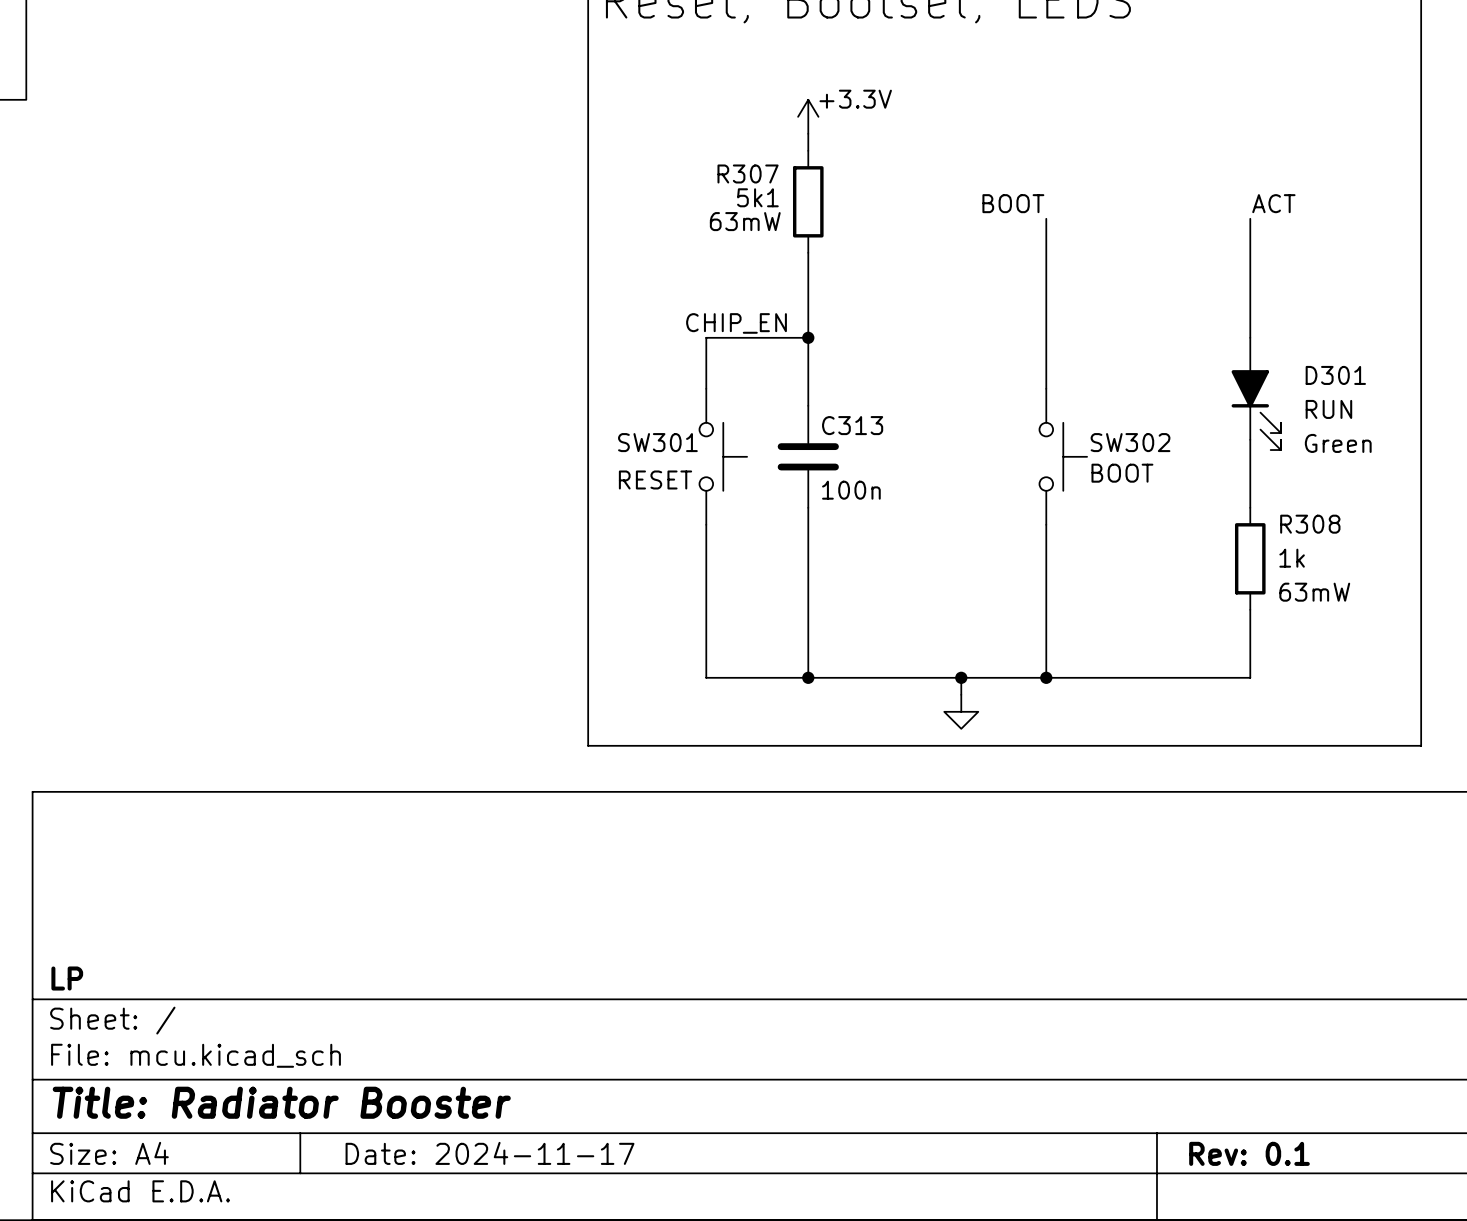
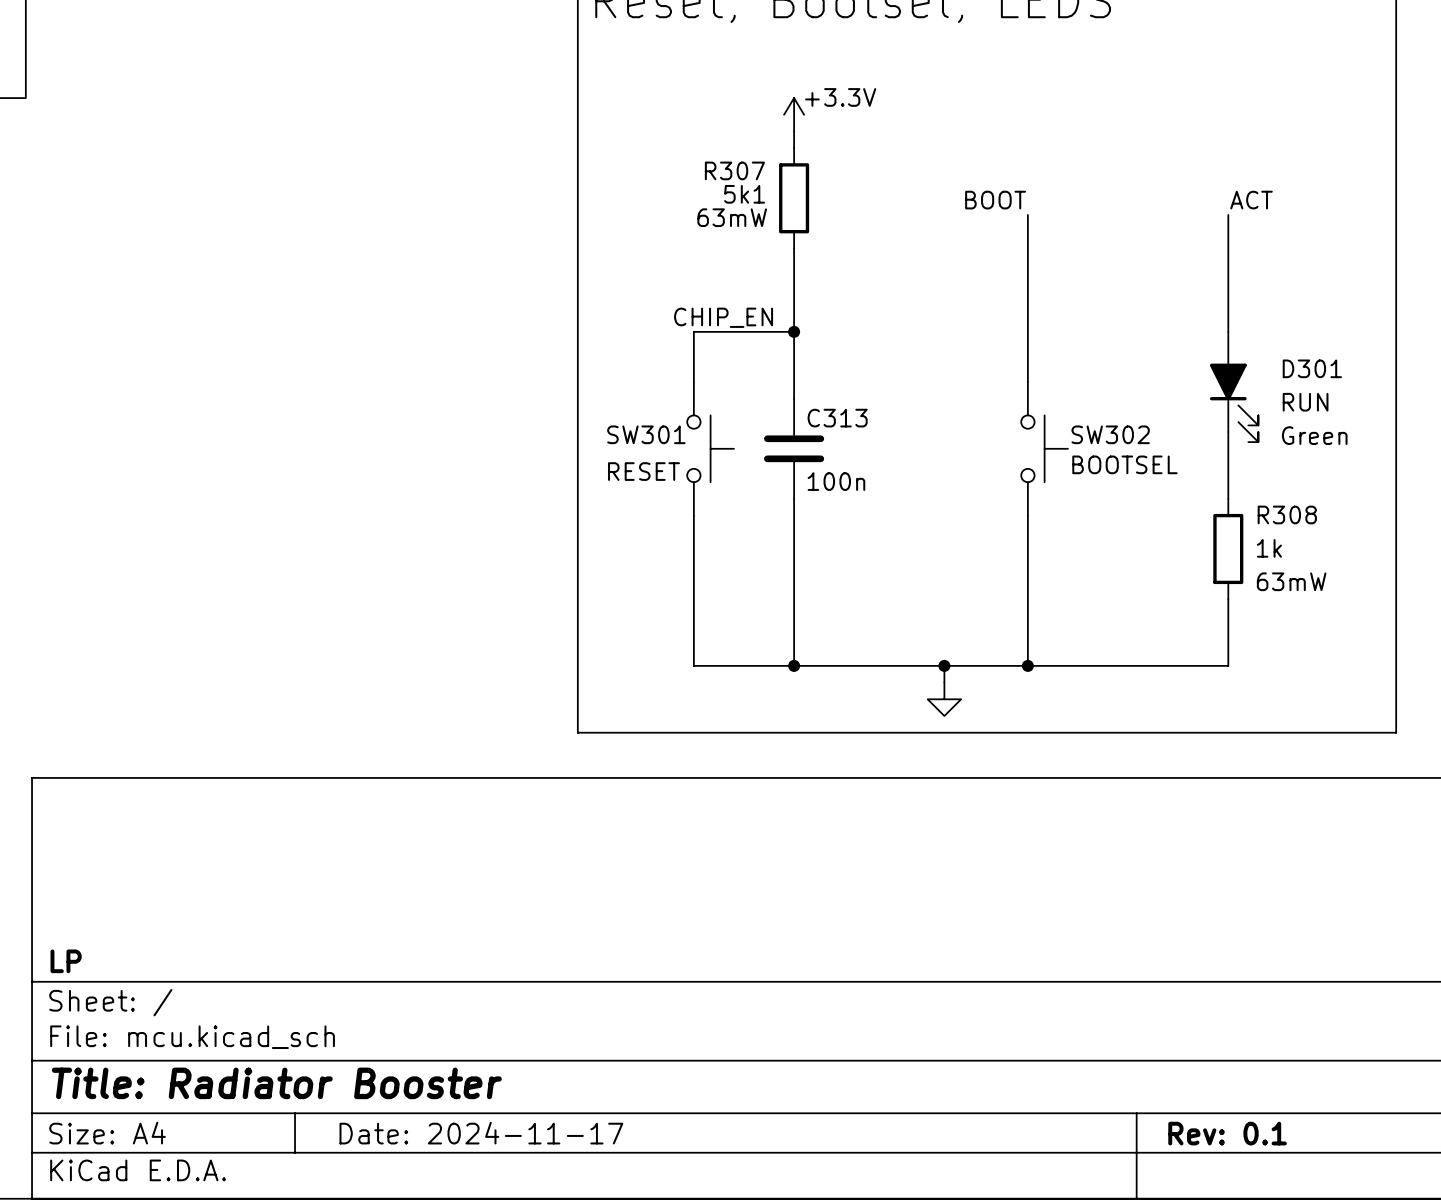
SW302 value: BOOT (1122, 473) -> BOOTSEL (1124, 464)

